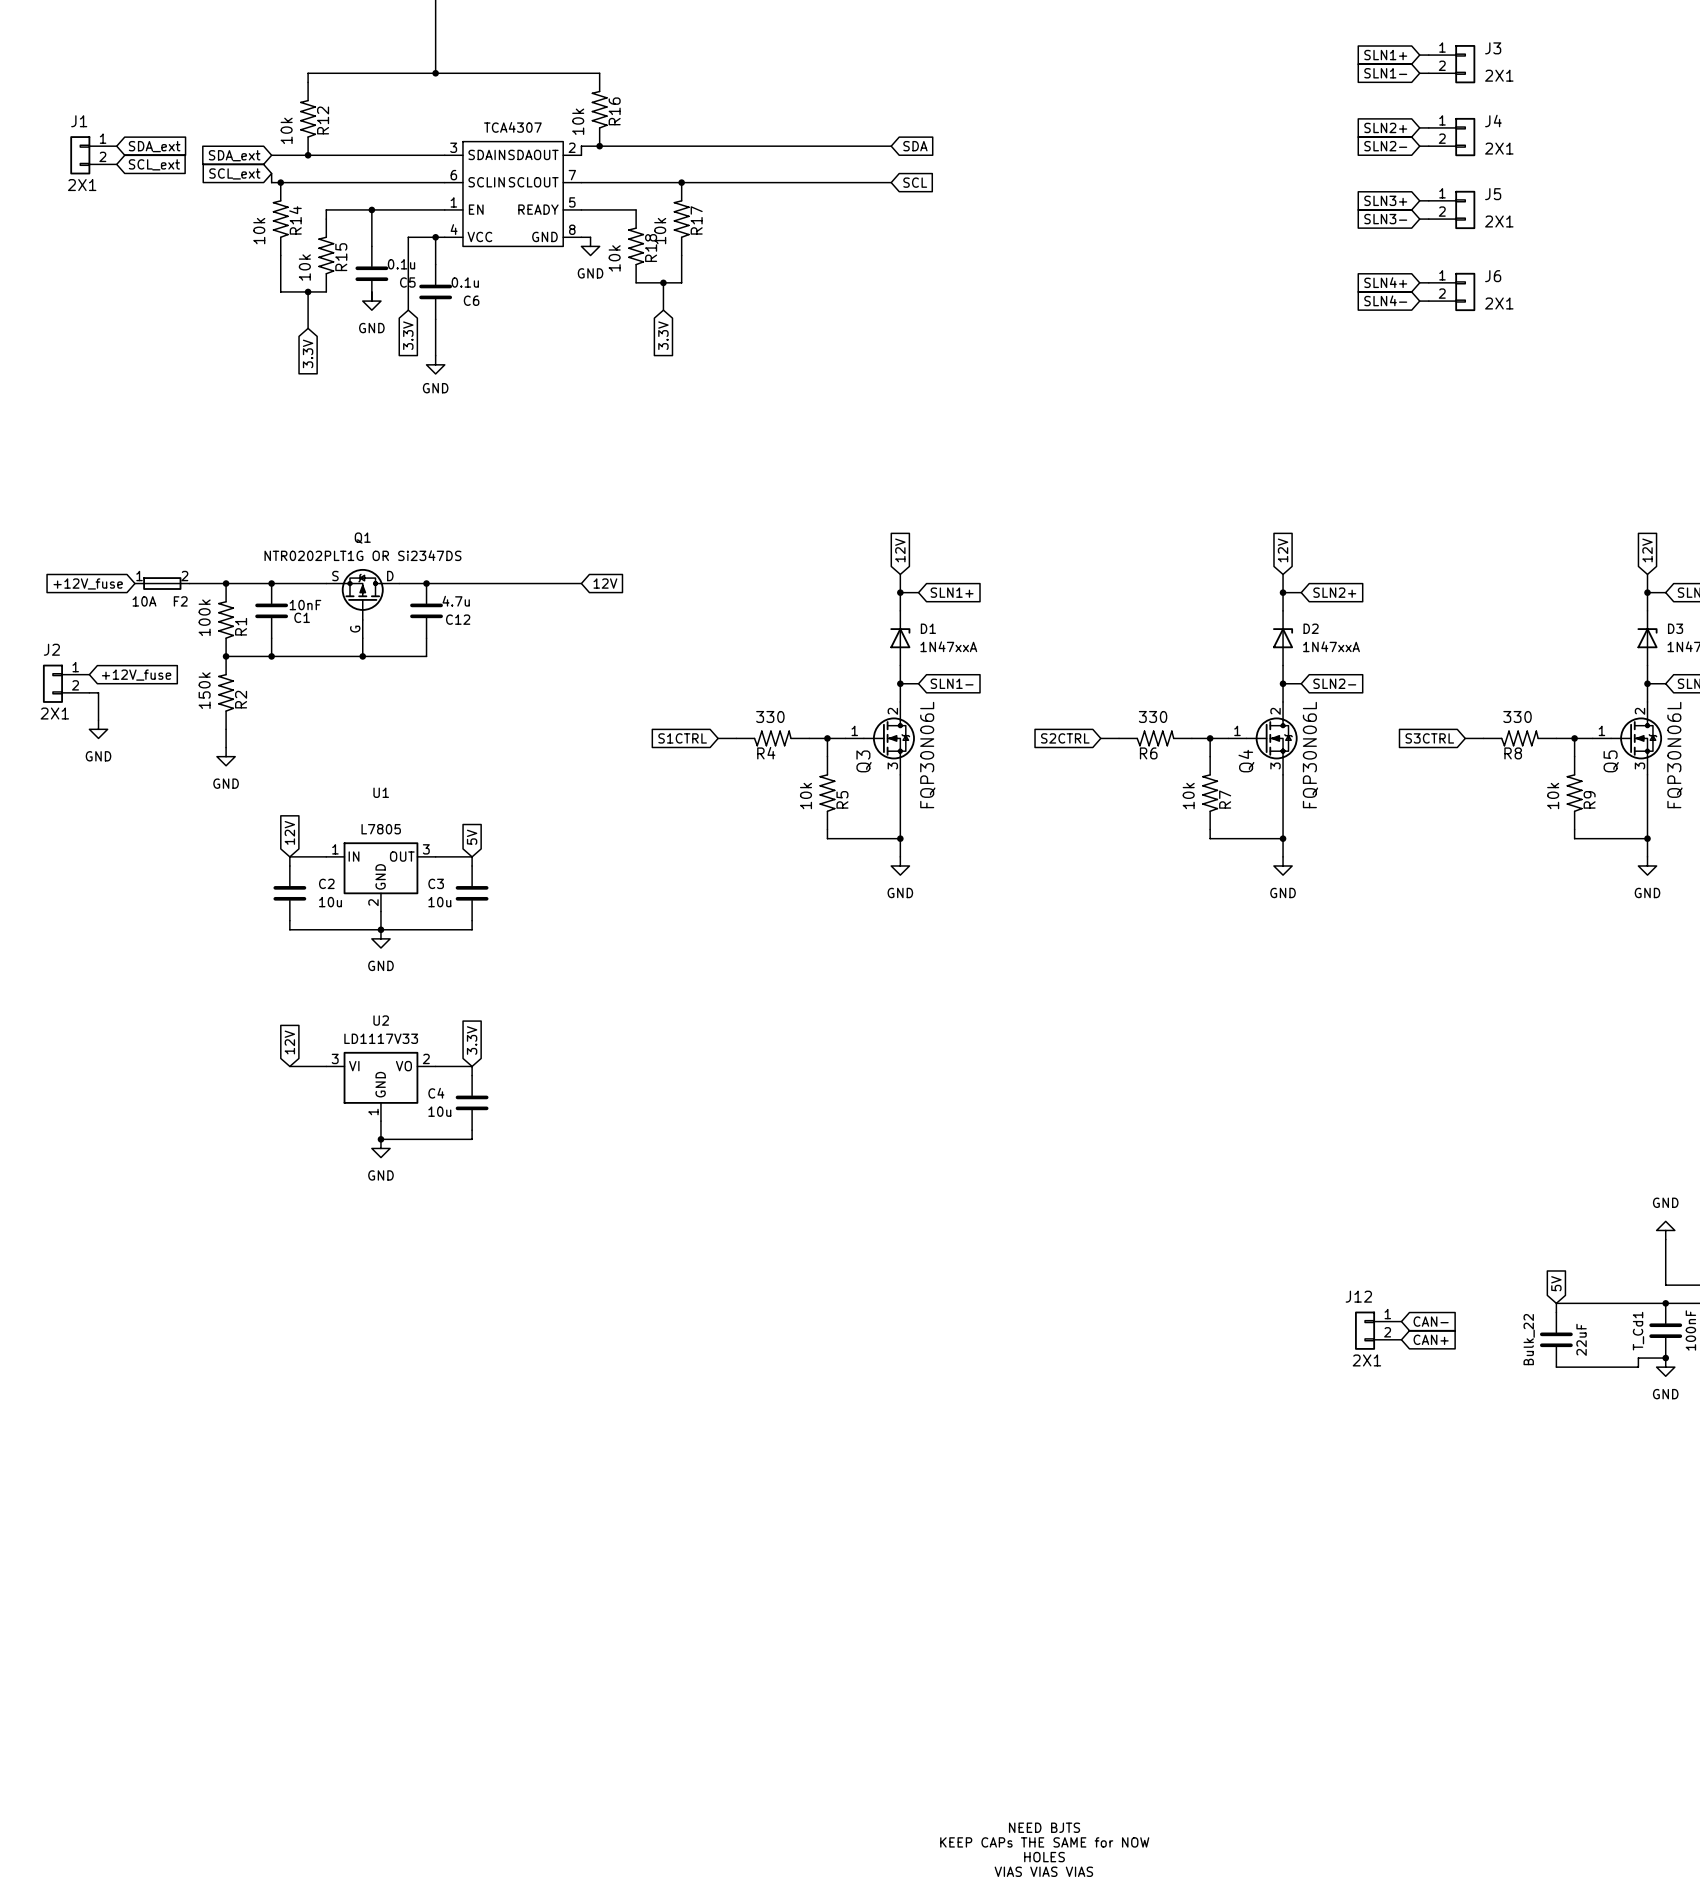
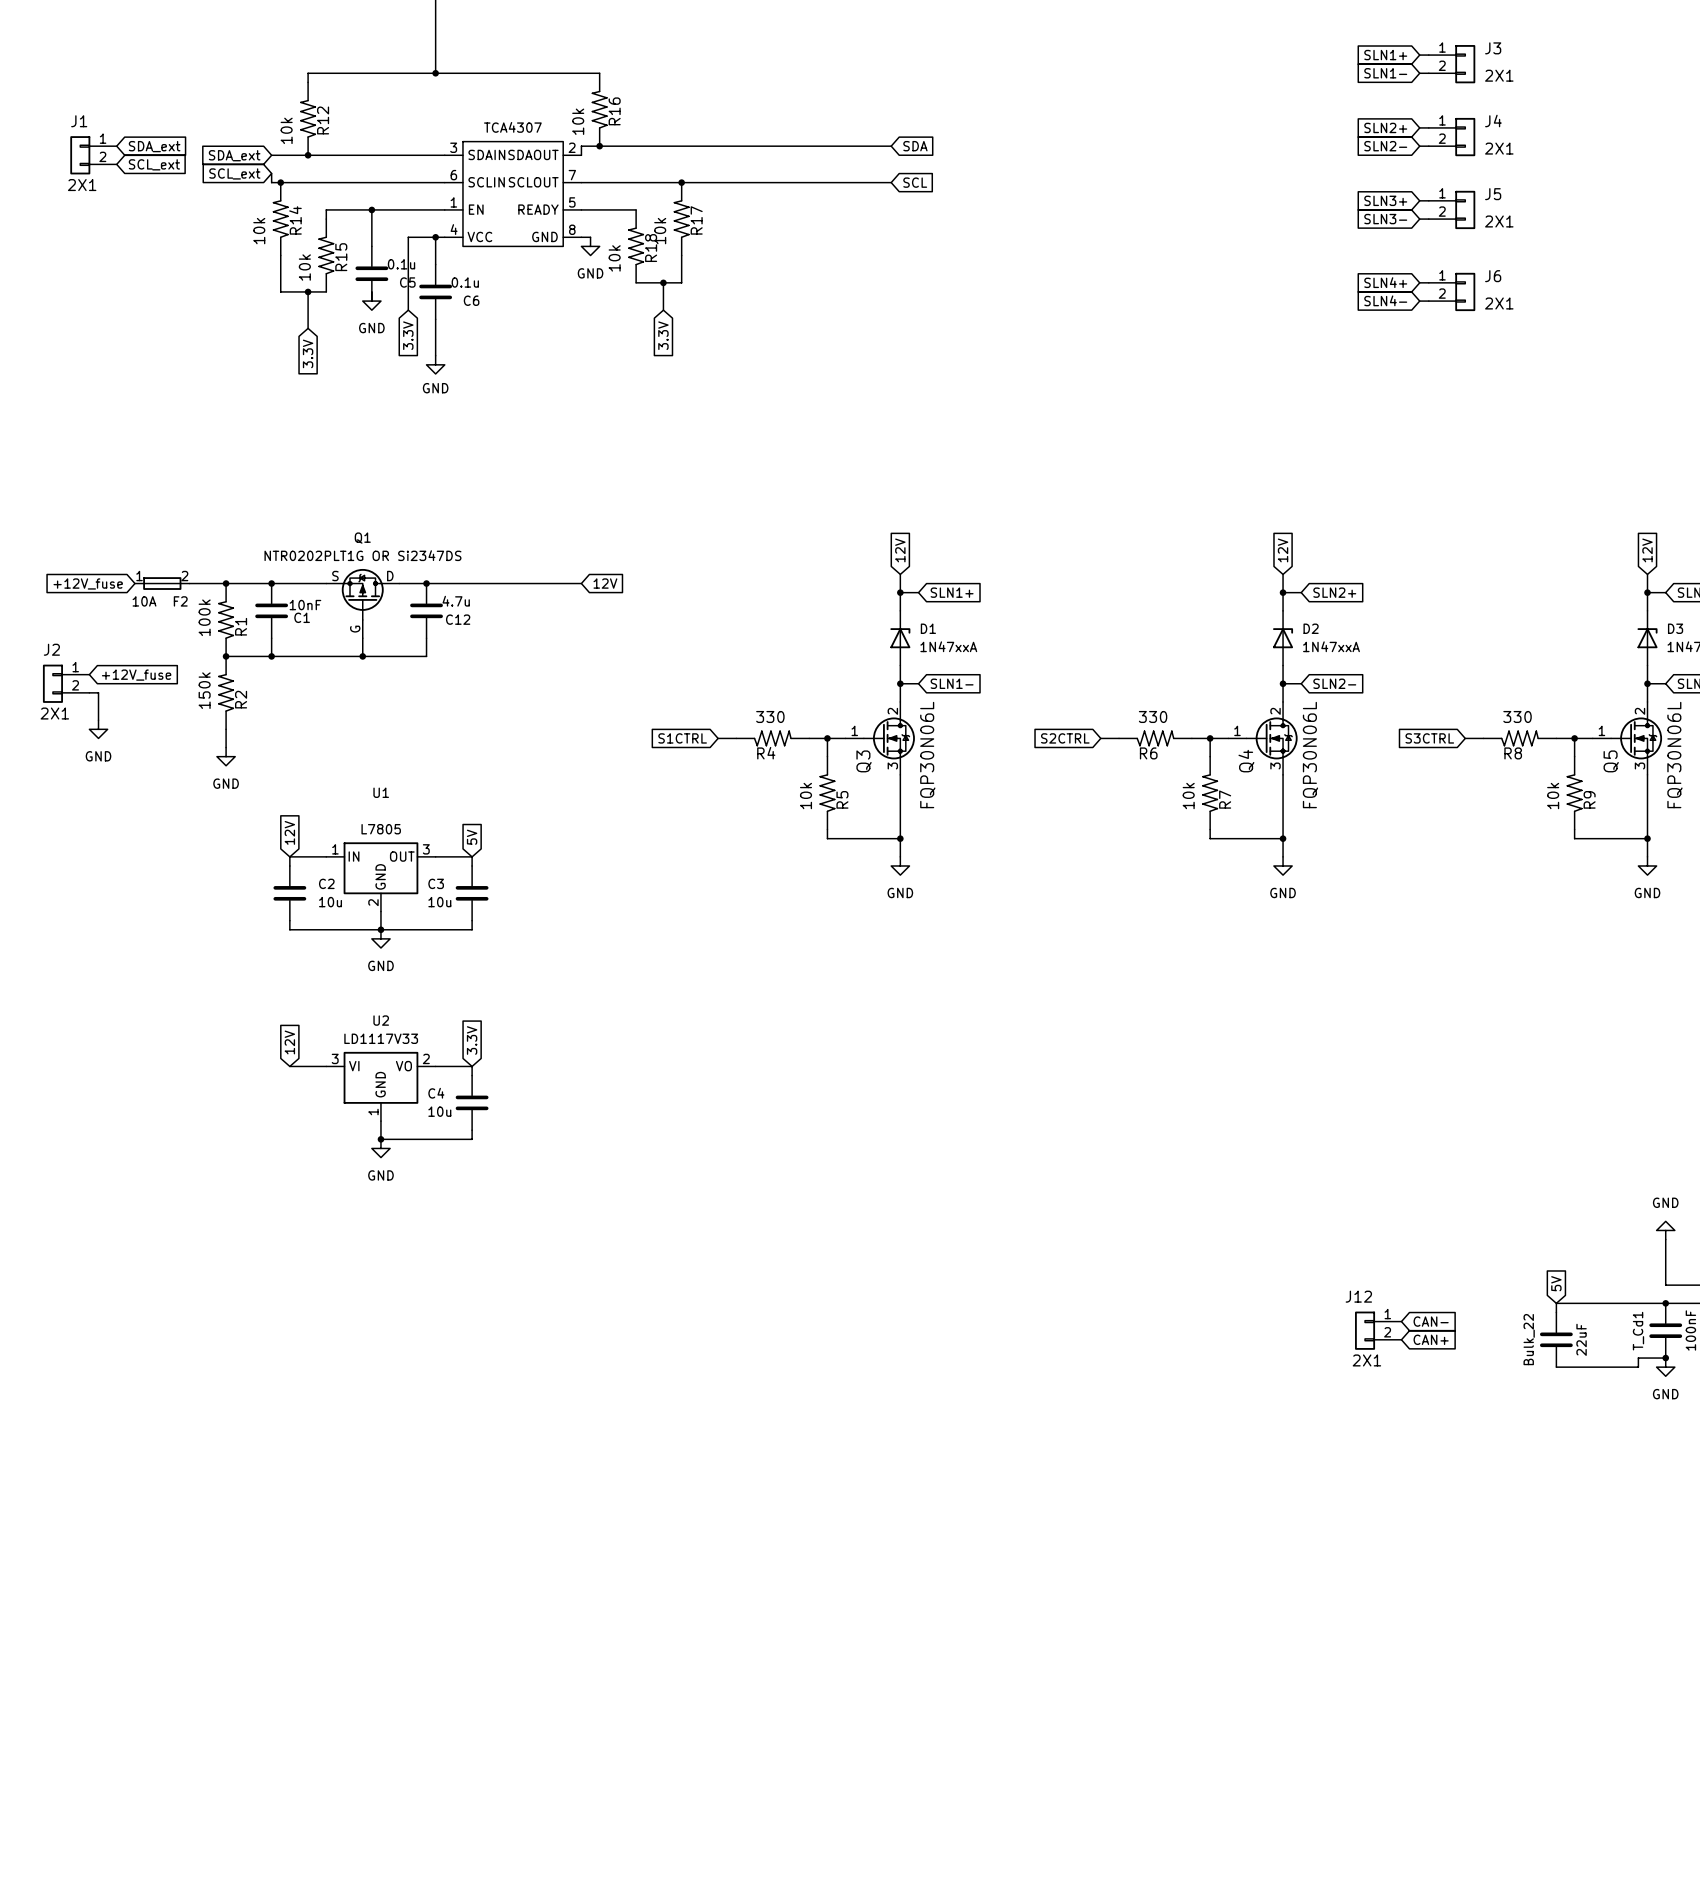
text: NEED BJTS (1044, 1827) -> none
text: KEEP CAPs THE SAME for NOW (1044, 1842) -> none
text: HOLES (1044, 1857) -> none
text: VIAS VIAS VIAS (1043, 1871) -> none

